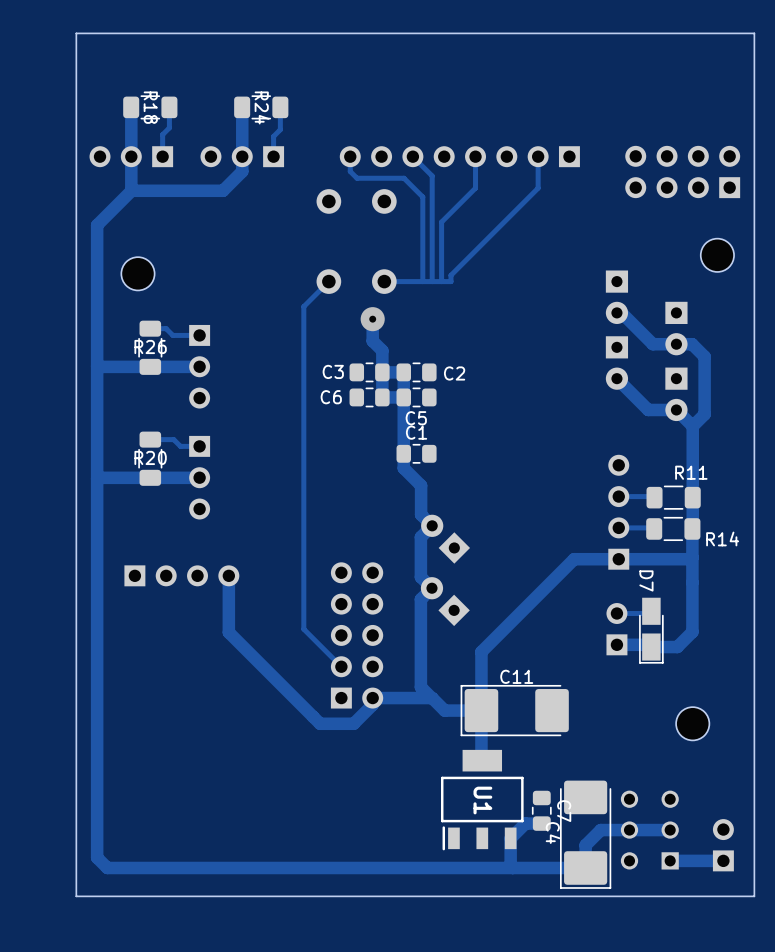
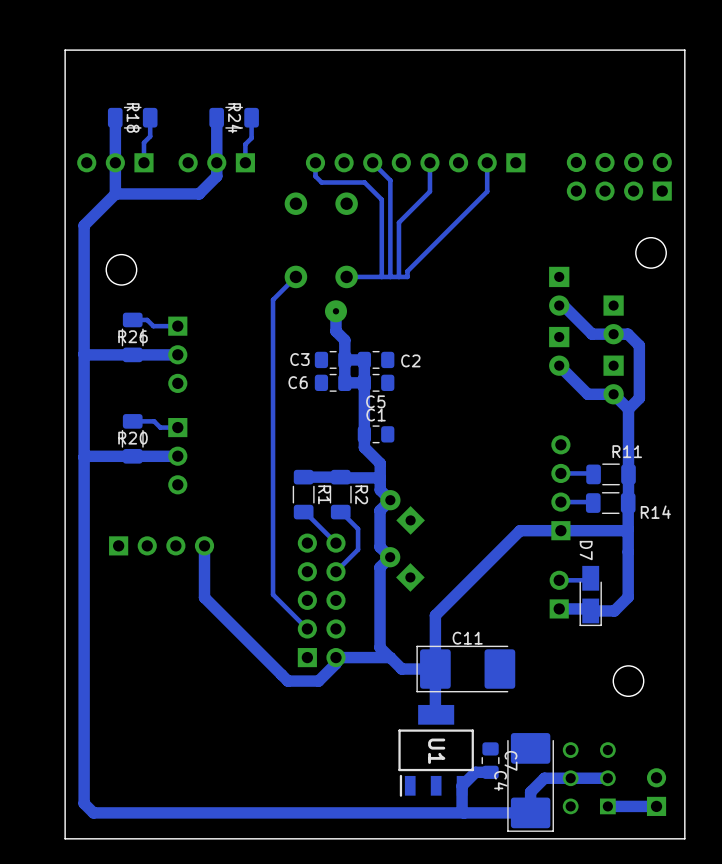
track: none -> (303, 477) (380, 477)
R1: none -> (303, 494)
R2: none -> (340, 494)
track: none -> (303, 512) (335, 543)
track: none -> (340, 512) (358, 528) (358, 549) (335, 571)

